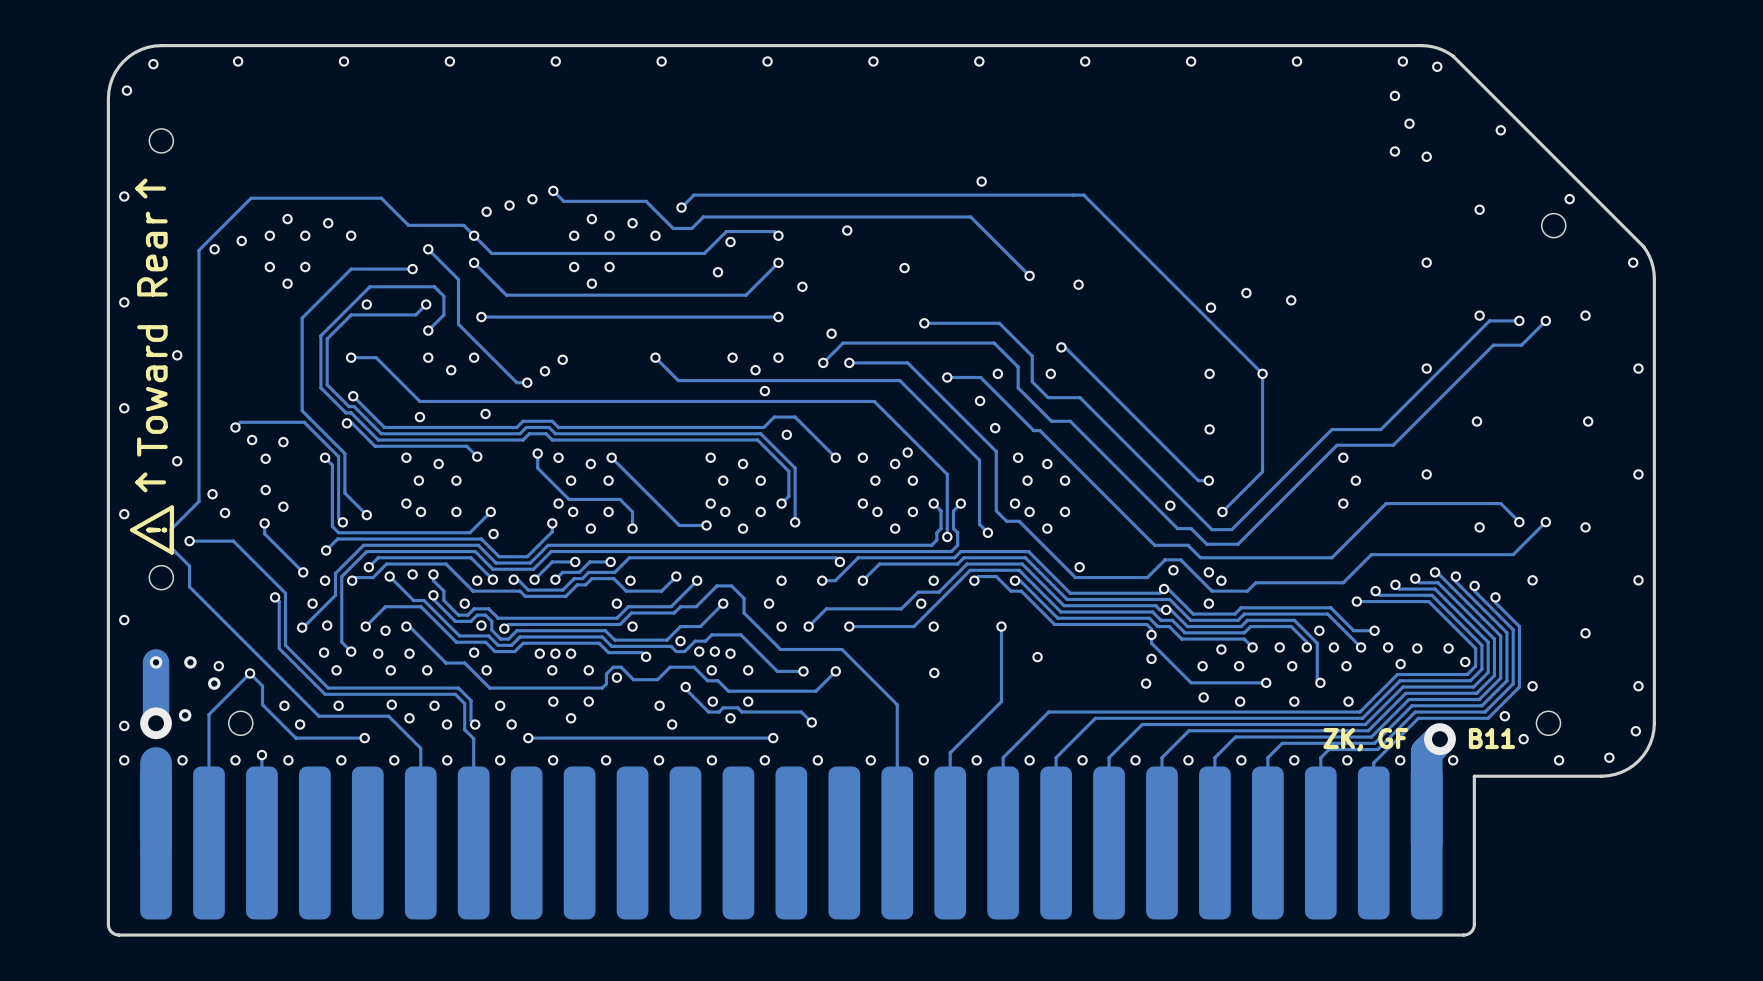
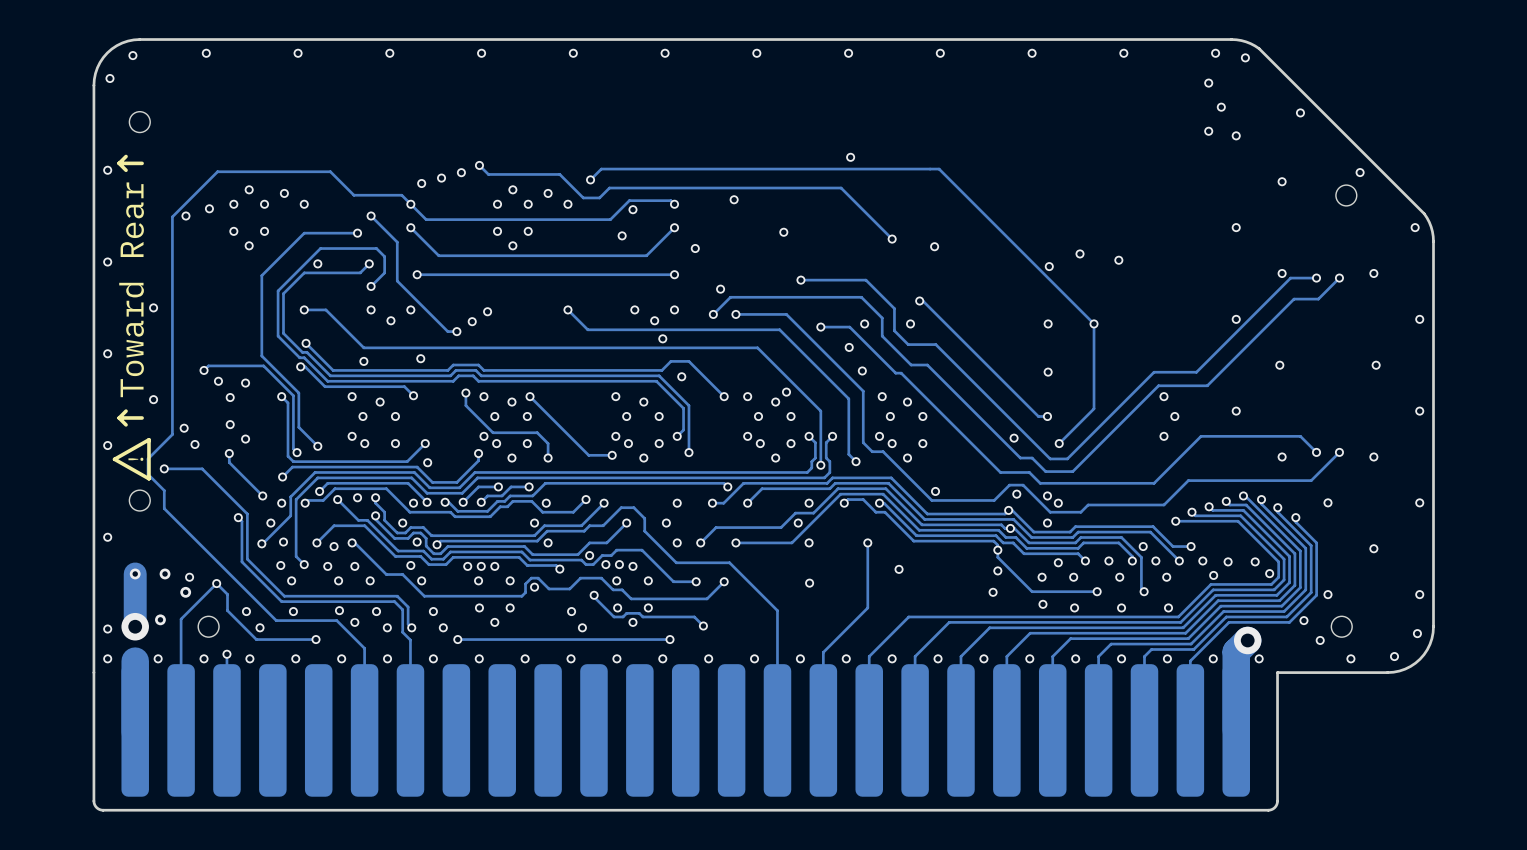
text: B11 (1491, 738) -> none
text: ZK, GF (1365, 739) -> none

